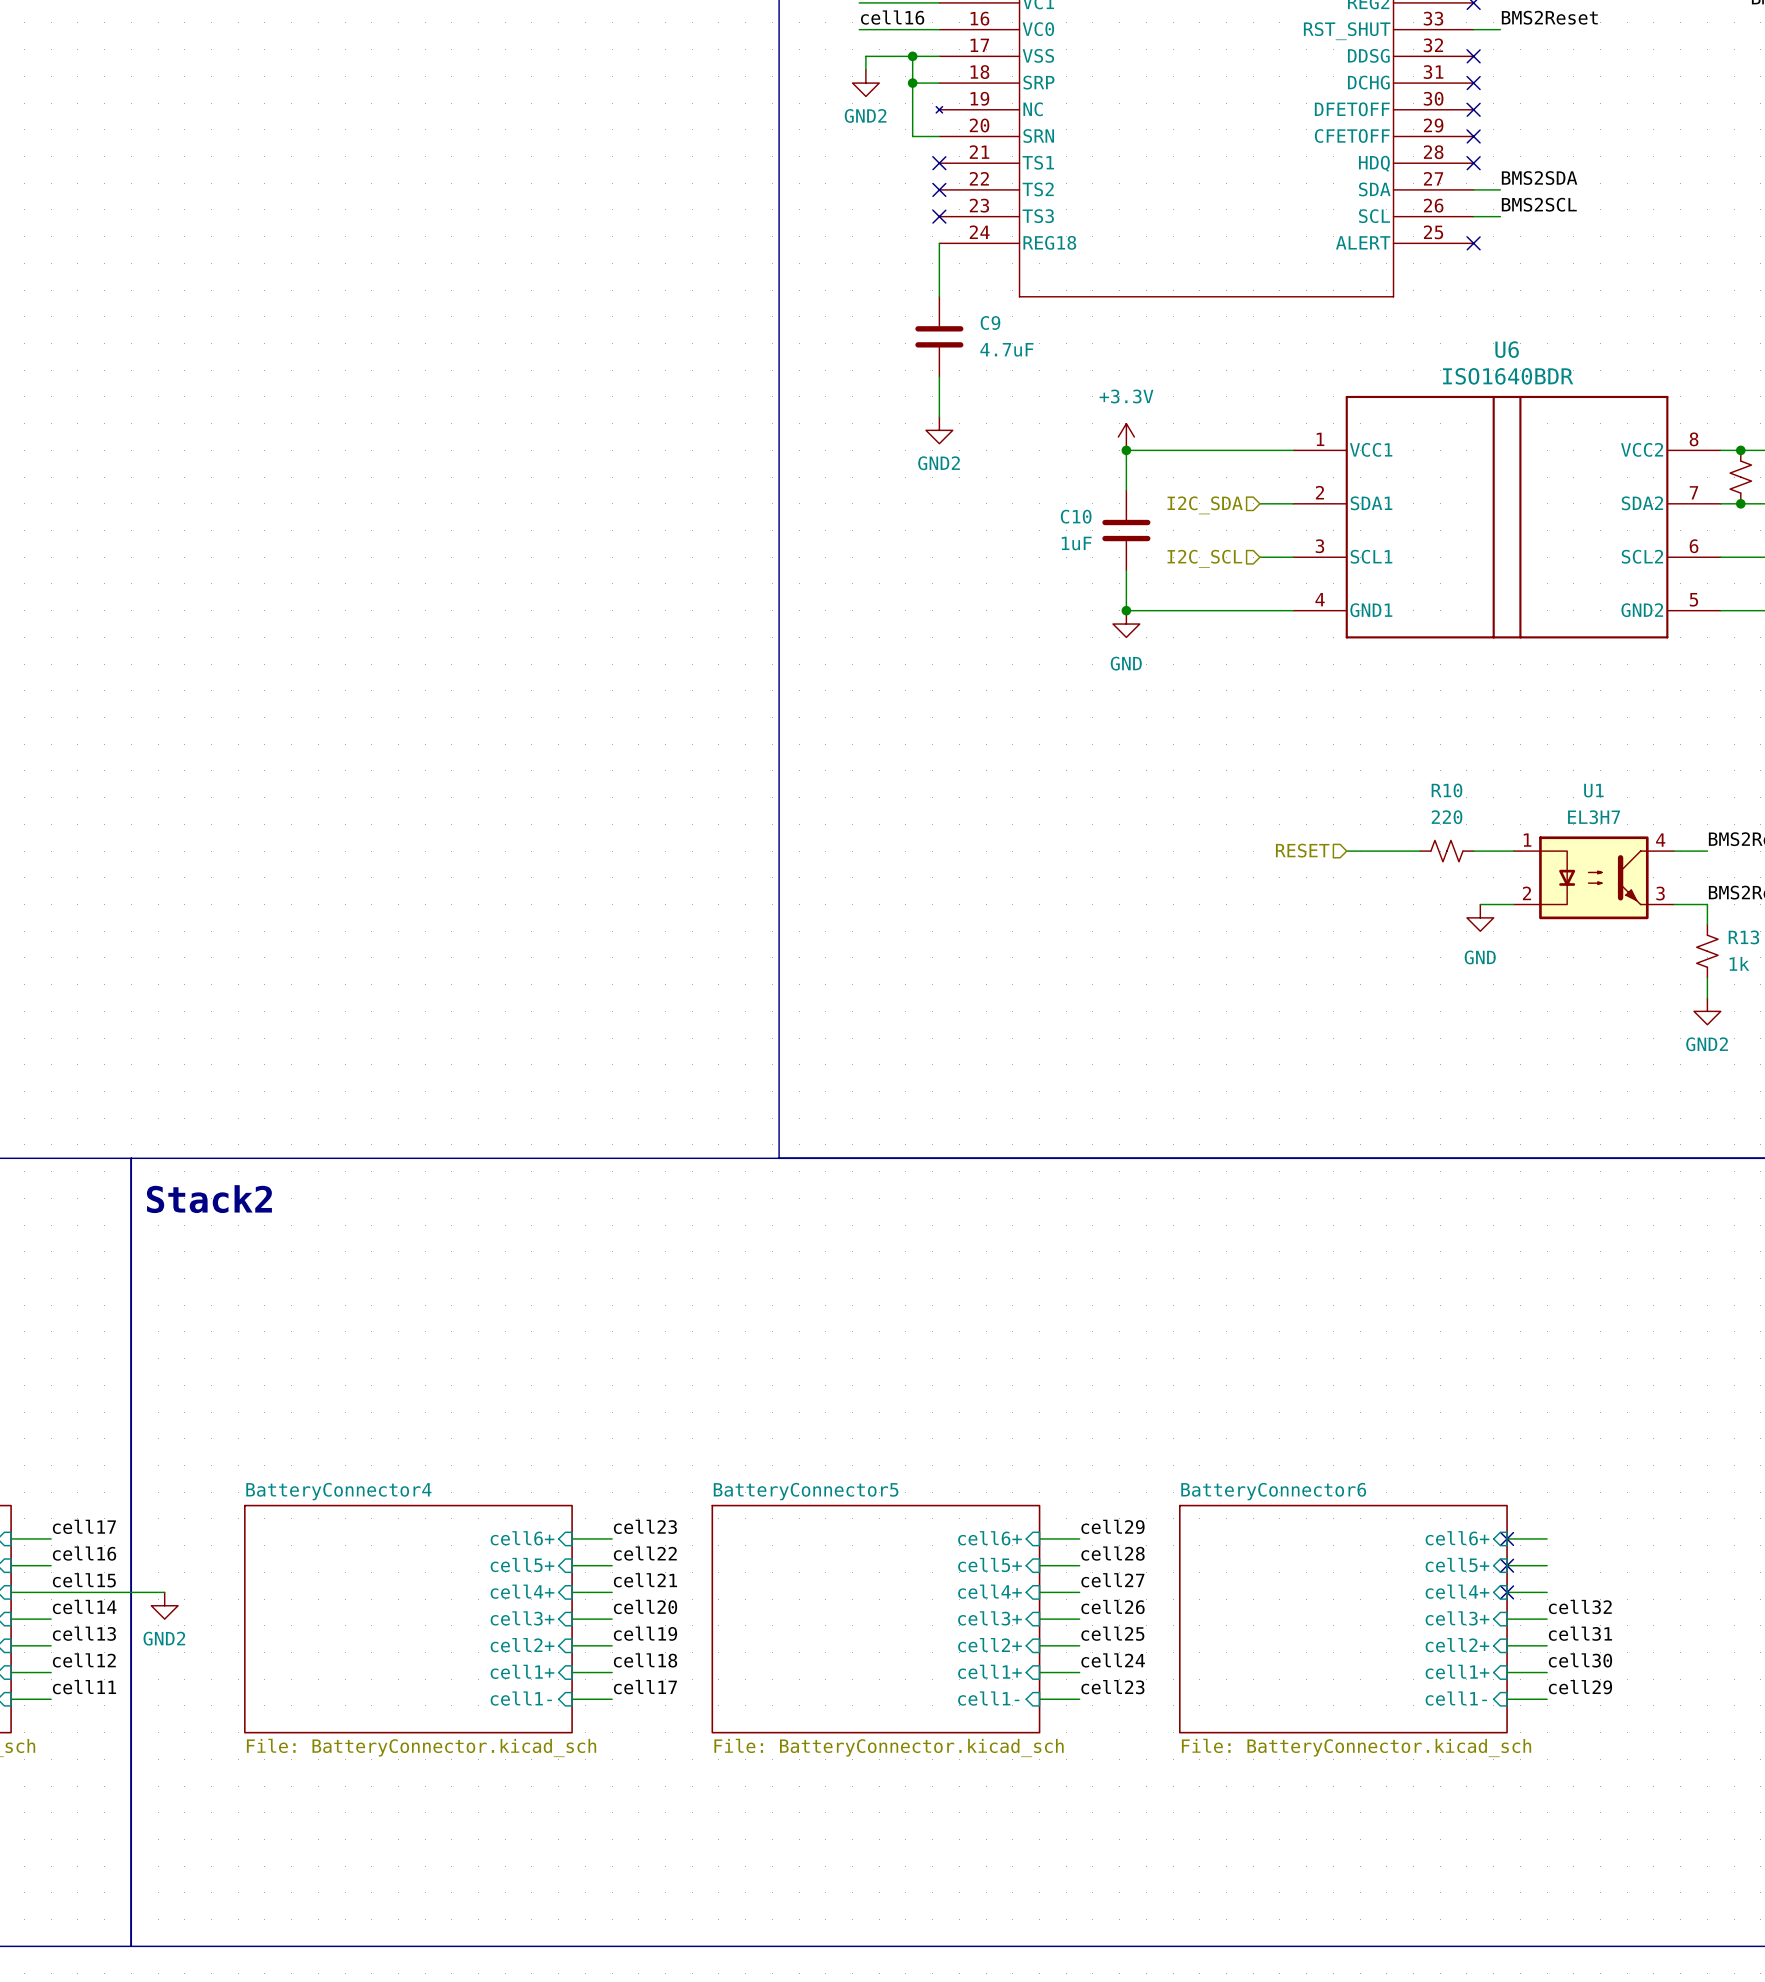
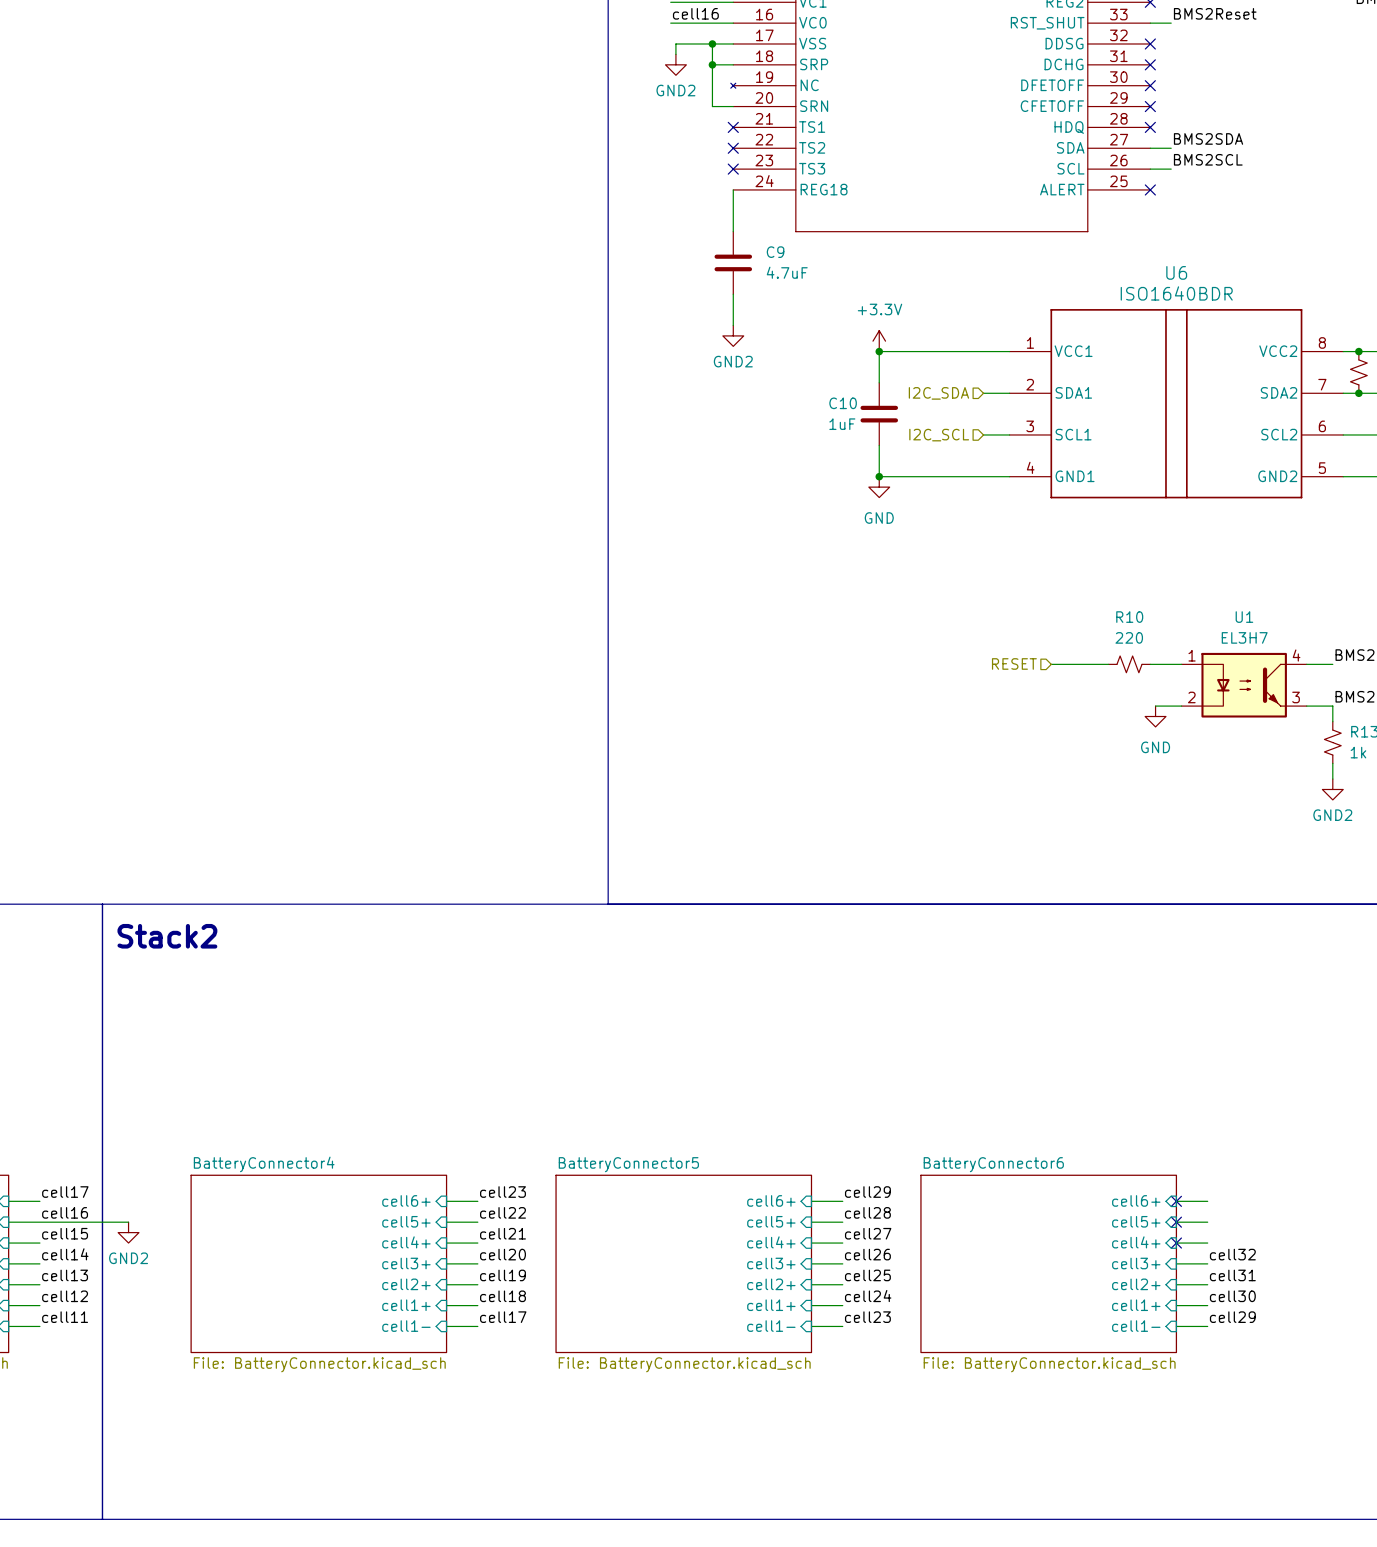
wire: (51, 1592) (164, 1592) -> (39, 1222) (128, 1222)
power symbol position: GND2 (164, 1605) -> GND2 (128, 1232)

